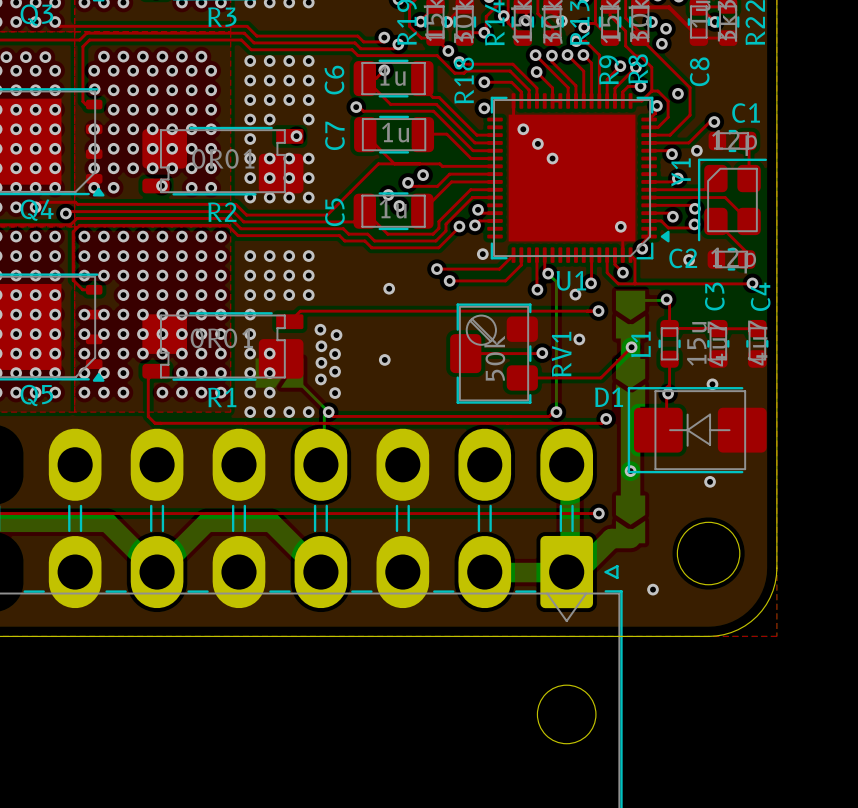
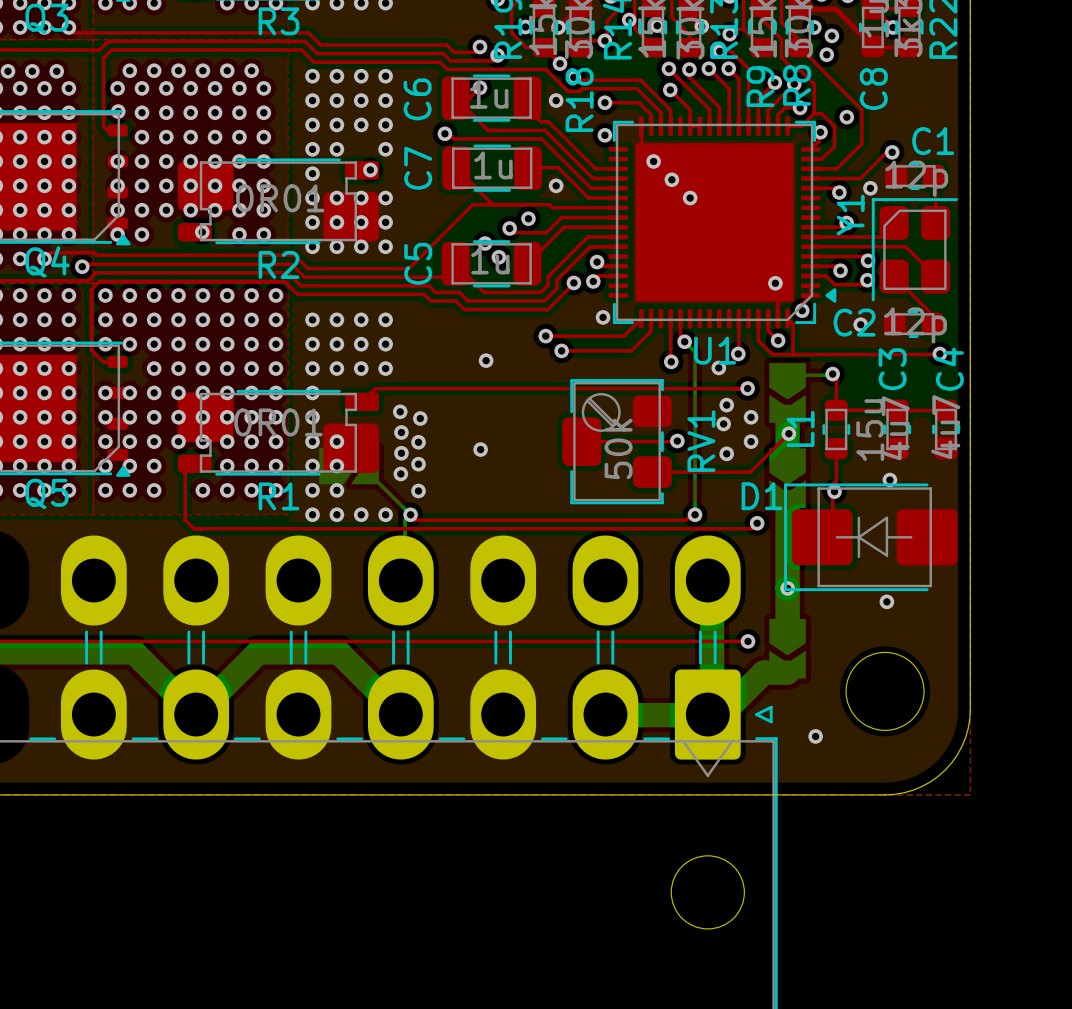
via: none -> (556, 100)
via: none -> (556, 185)
via: none -> (726, 405)
via: none -> (751, 417)
via: none -> (751, 441)
via: none -> (726, 453)

